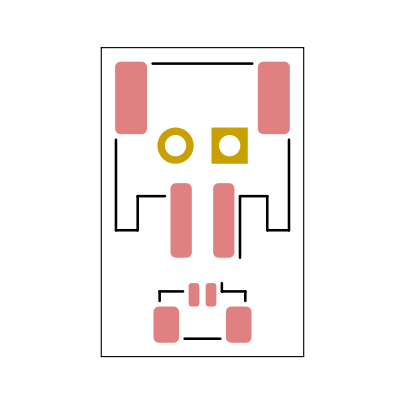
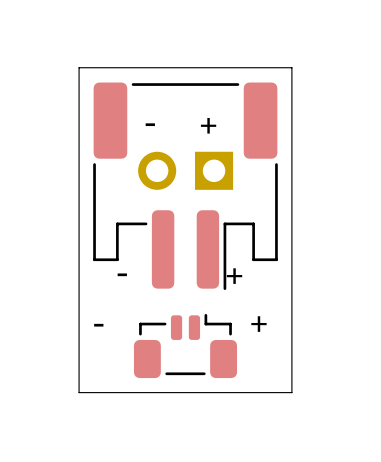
text: none -> - (150, 124)
text: none -> + (208, 125)
text: none -> - (122, 274)
text: none -> + (234, 276)
text: none -> + (258, 324)
text: none -> - (98, 325)

